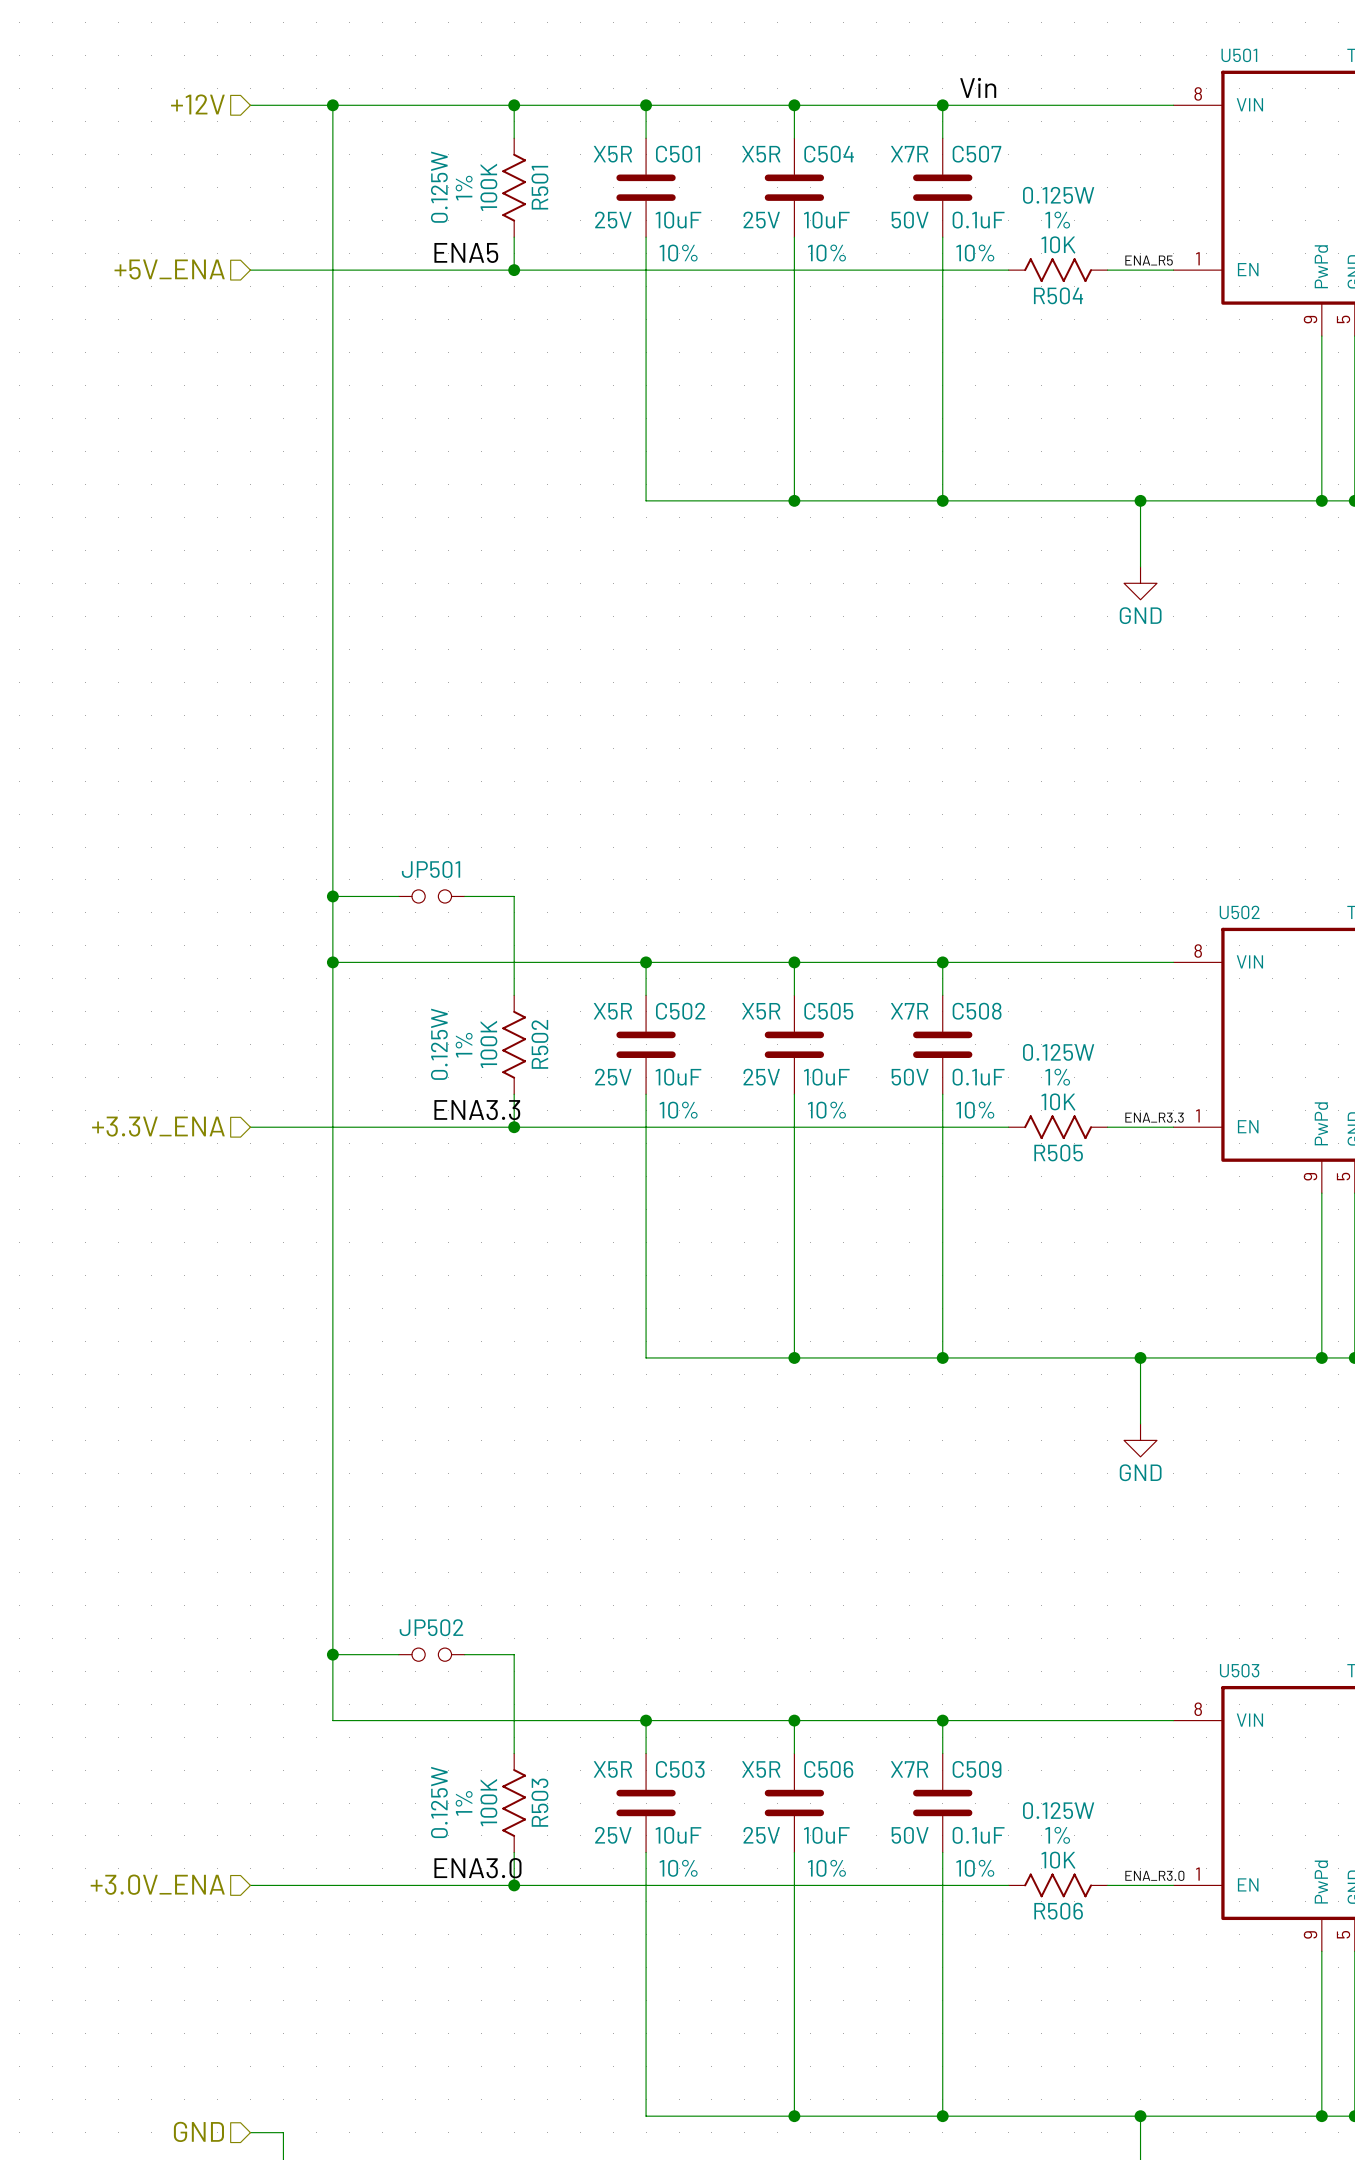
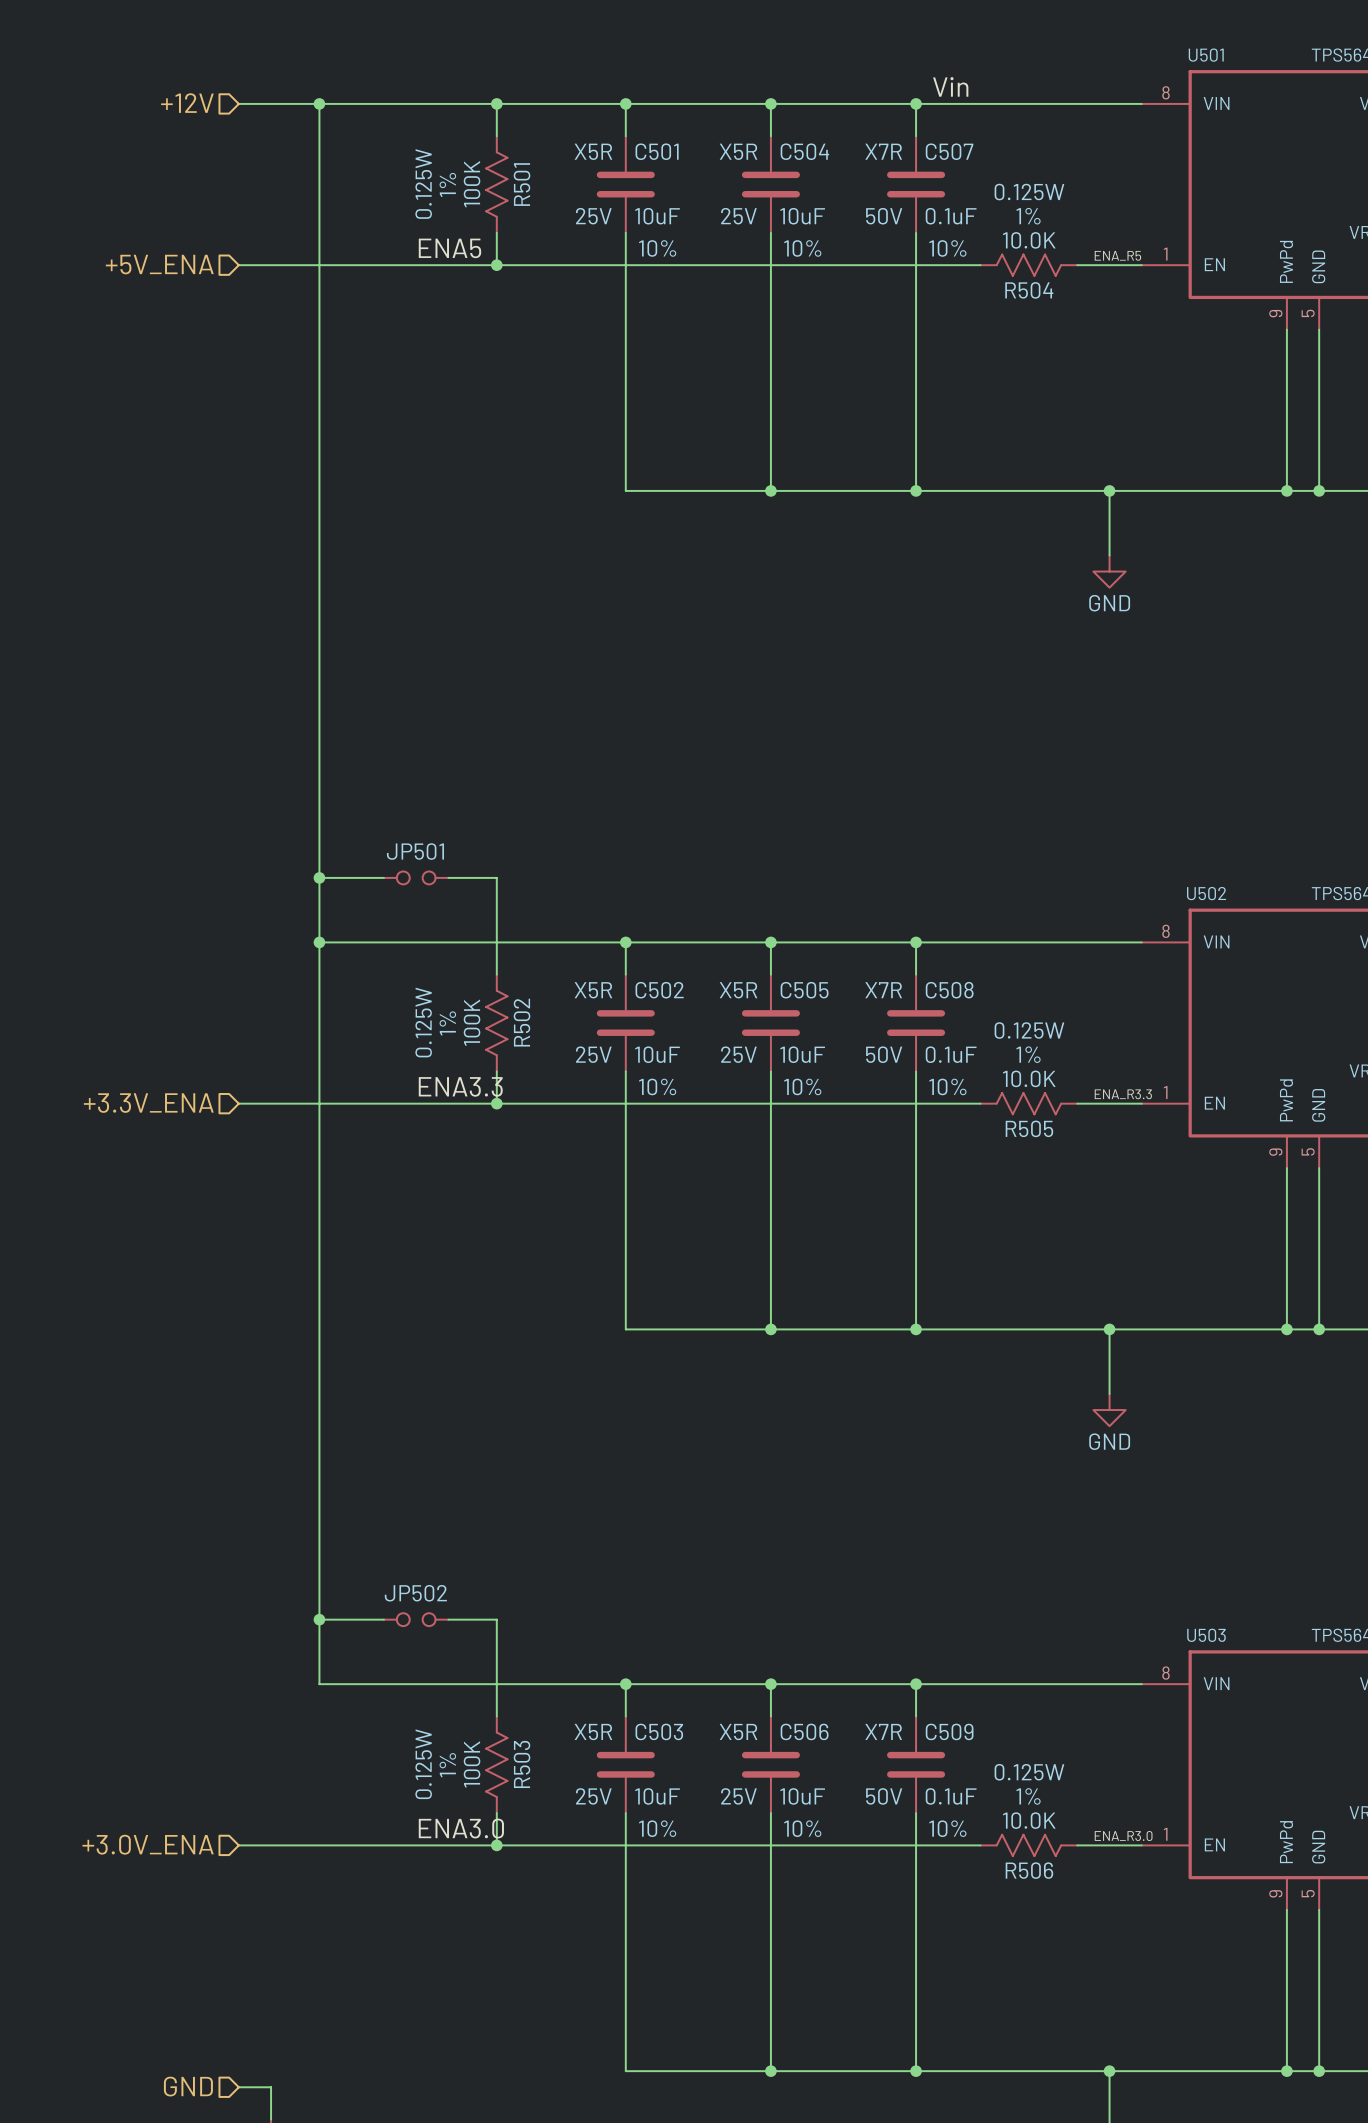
R504 value: 10K (1058, 244) -> 10.0K (1029, 240)
R505 value: 10K (1058, 1101) -> 10.0K (1029, 1078)
R506 value: 10K (1058, 1860) -> 10.0K (1029, 1820)

